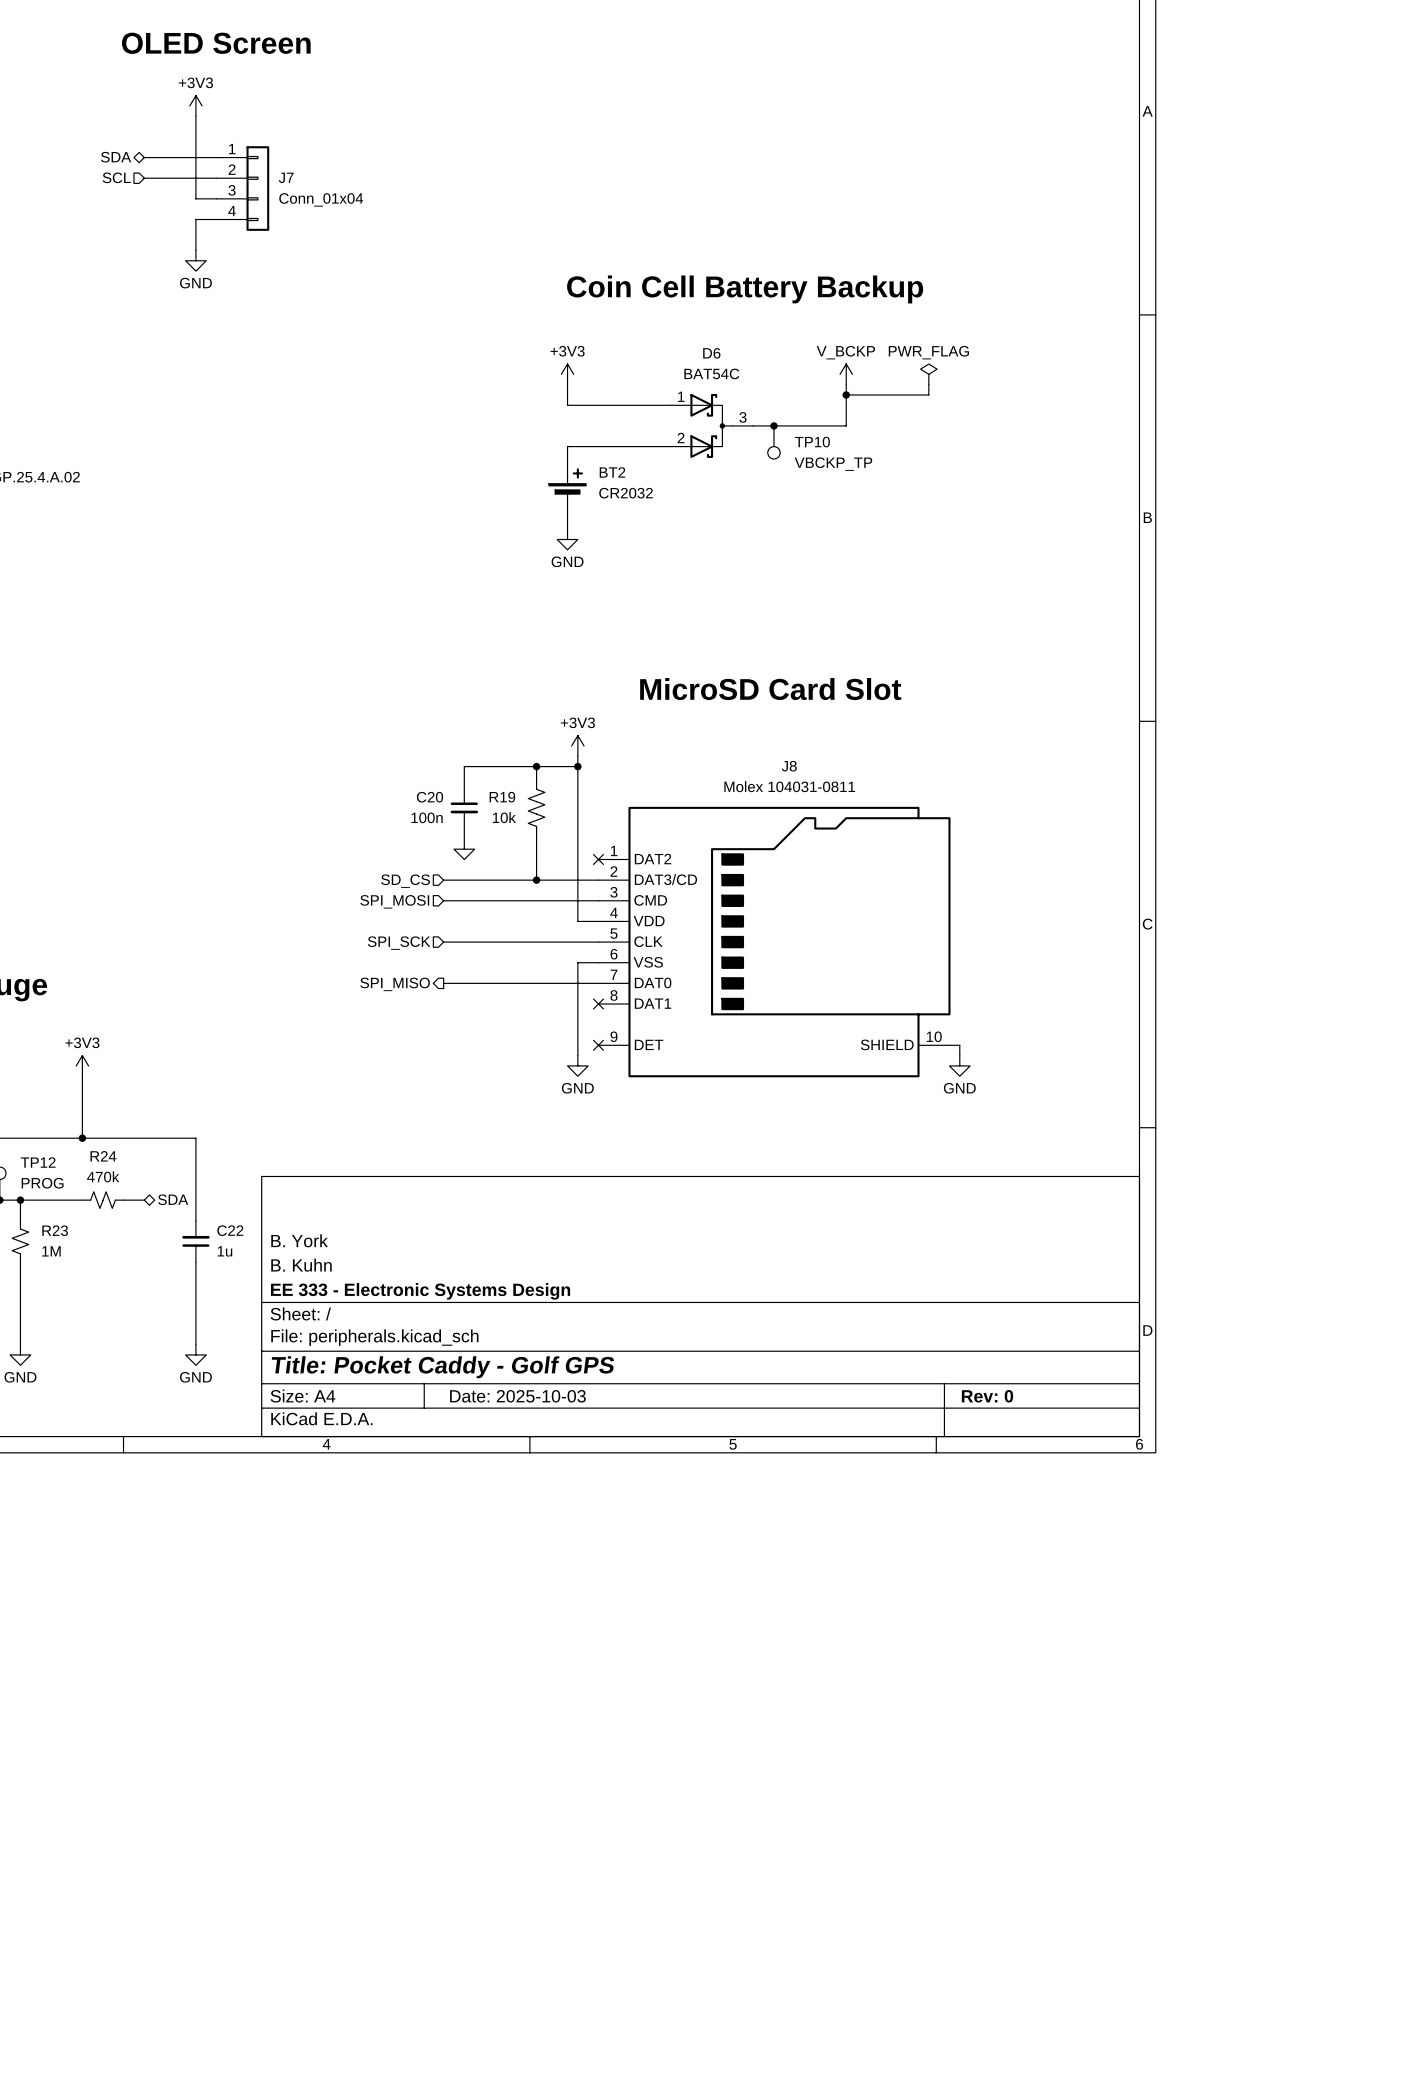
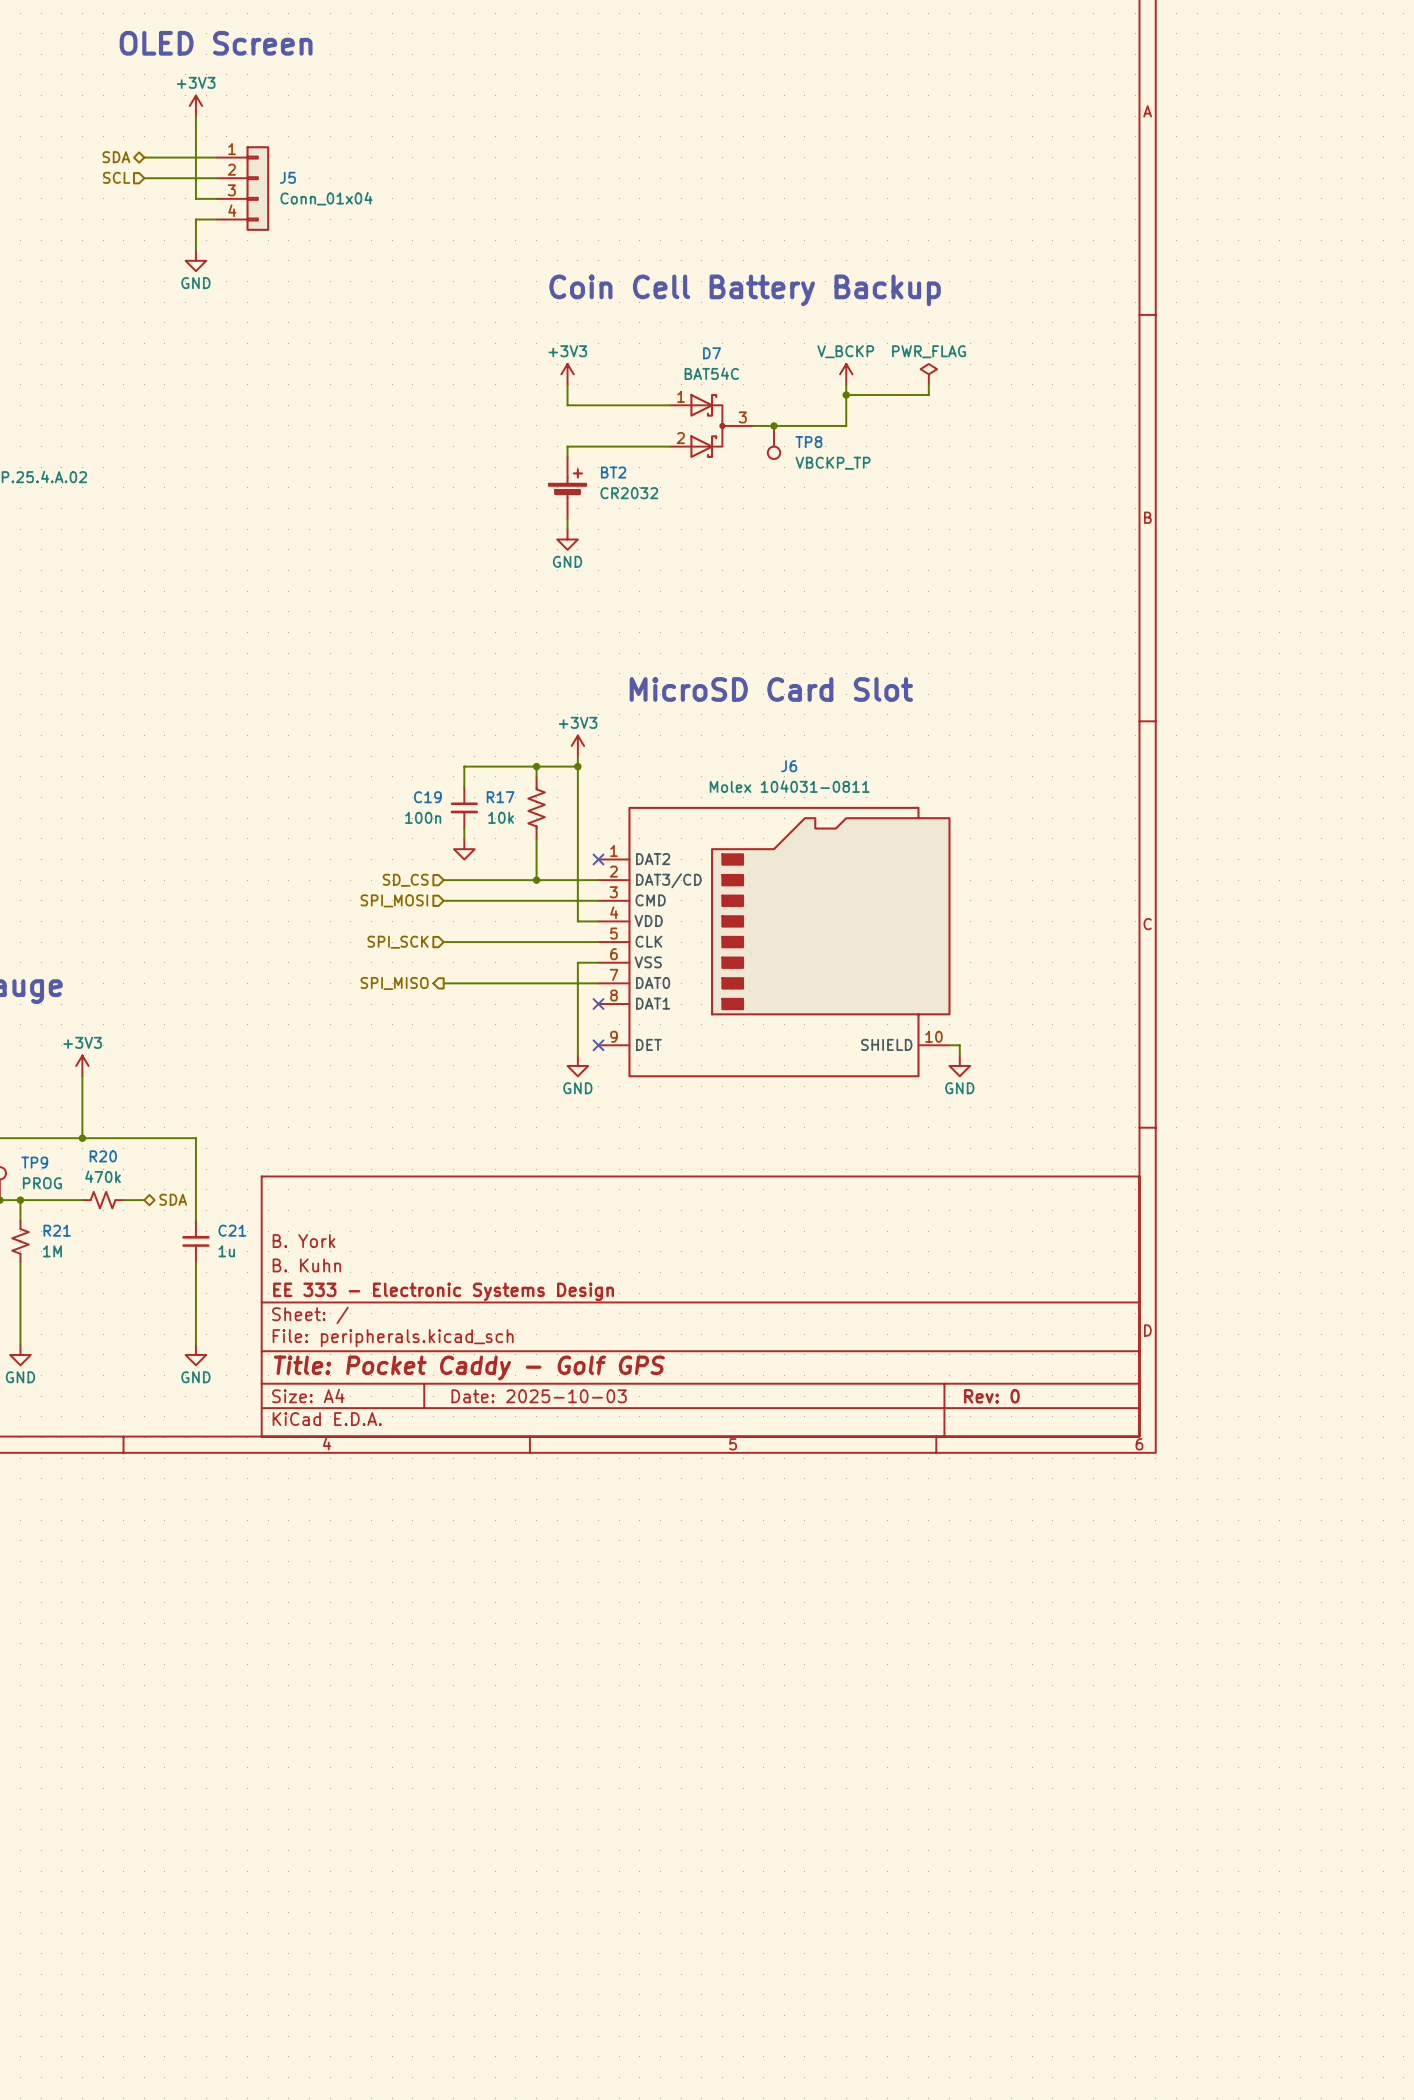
J7 name: J7 (286, 177) -> J5 (287, 177)
D6 name: D6 (711, 353) -> D7 (712, 353)
TP10 name: TP10 (812, 442) -> TP8 (808, 442)
J8 name: J8 (789, 766) -> J6 (789, 766)
C20 name: C20 (429, 797) -> C19 (427, 797)
R19 name: R19 (502, 797) -> R17 (500, 797)
R24 name: R24 (103, 1156) -> R20 (103, 1156)
TP12 name: TP12 (38, 1162) -> TP9 (34, 1162)
R23 name: R23 (55, 1230) -> R21 (57, 1230)
C22 name: C22 (230, 1230) -> C21 (232, 1230)

